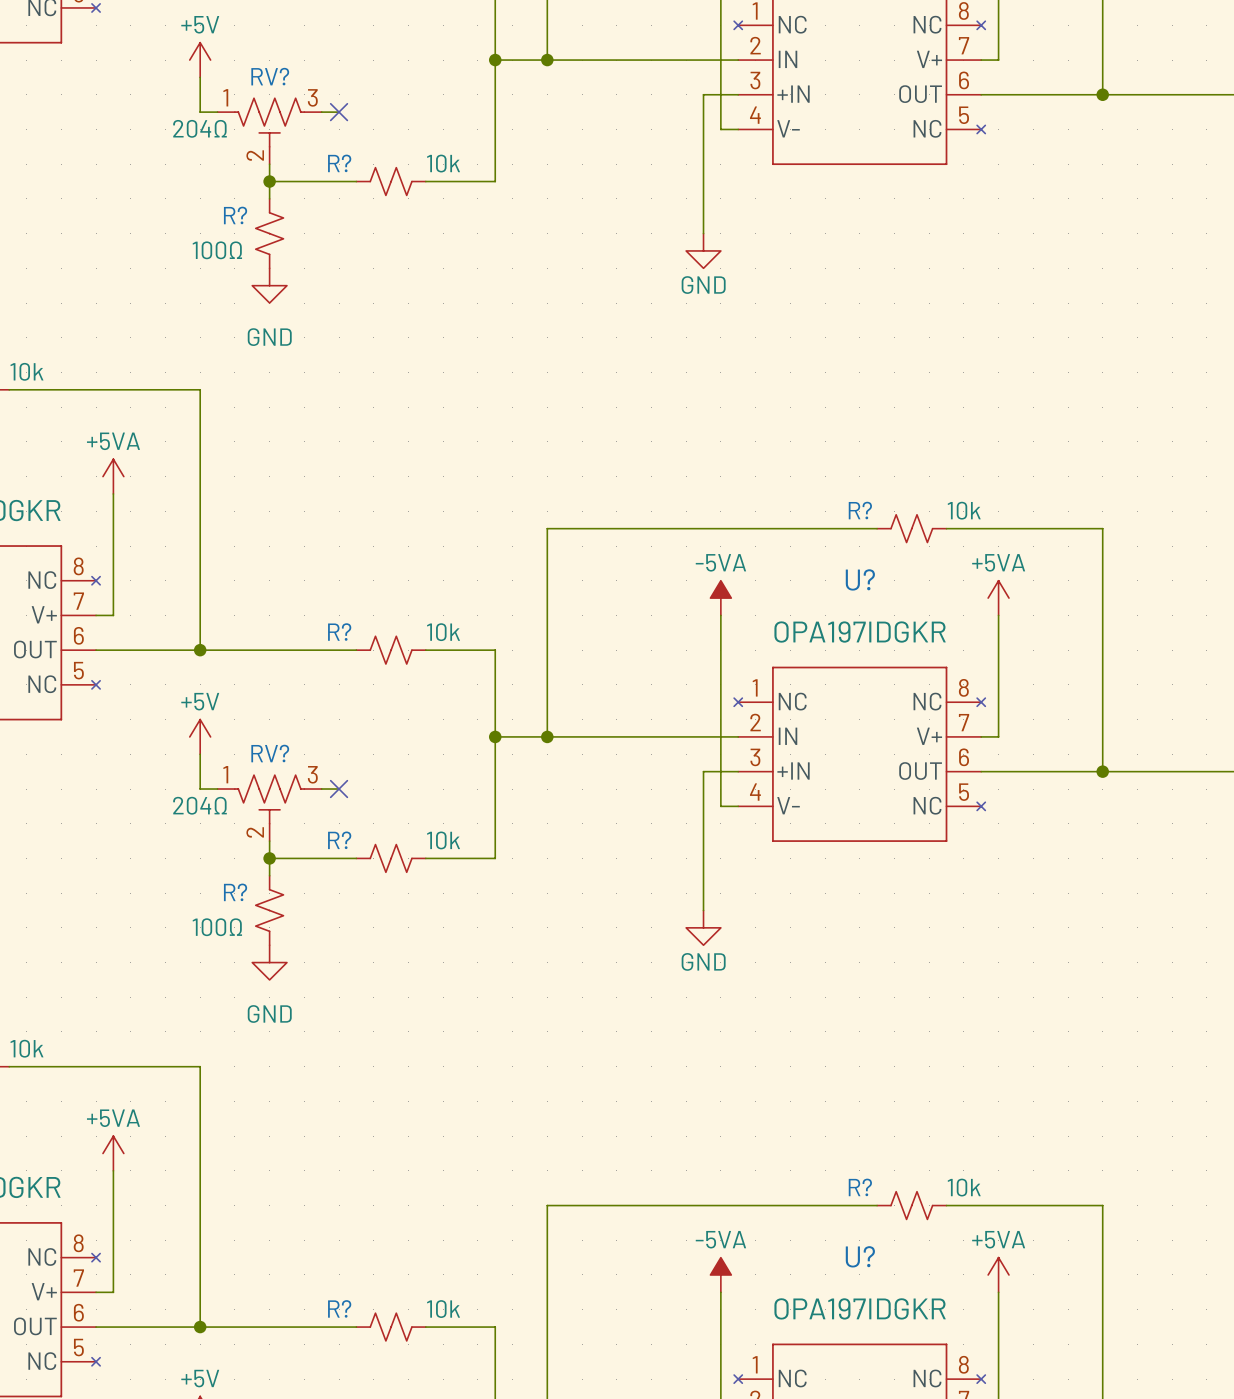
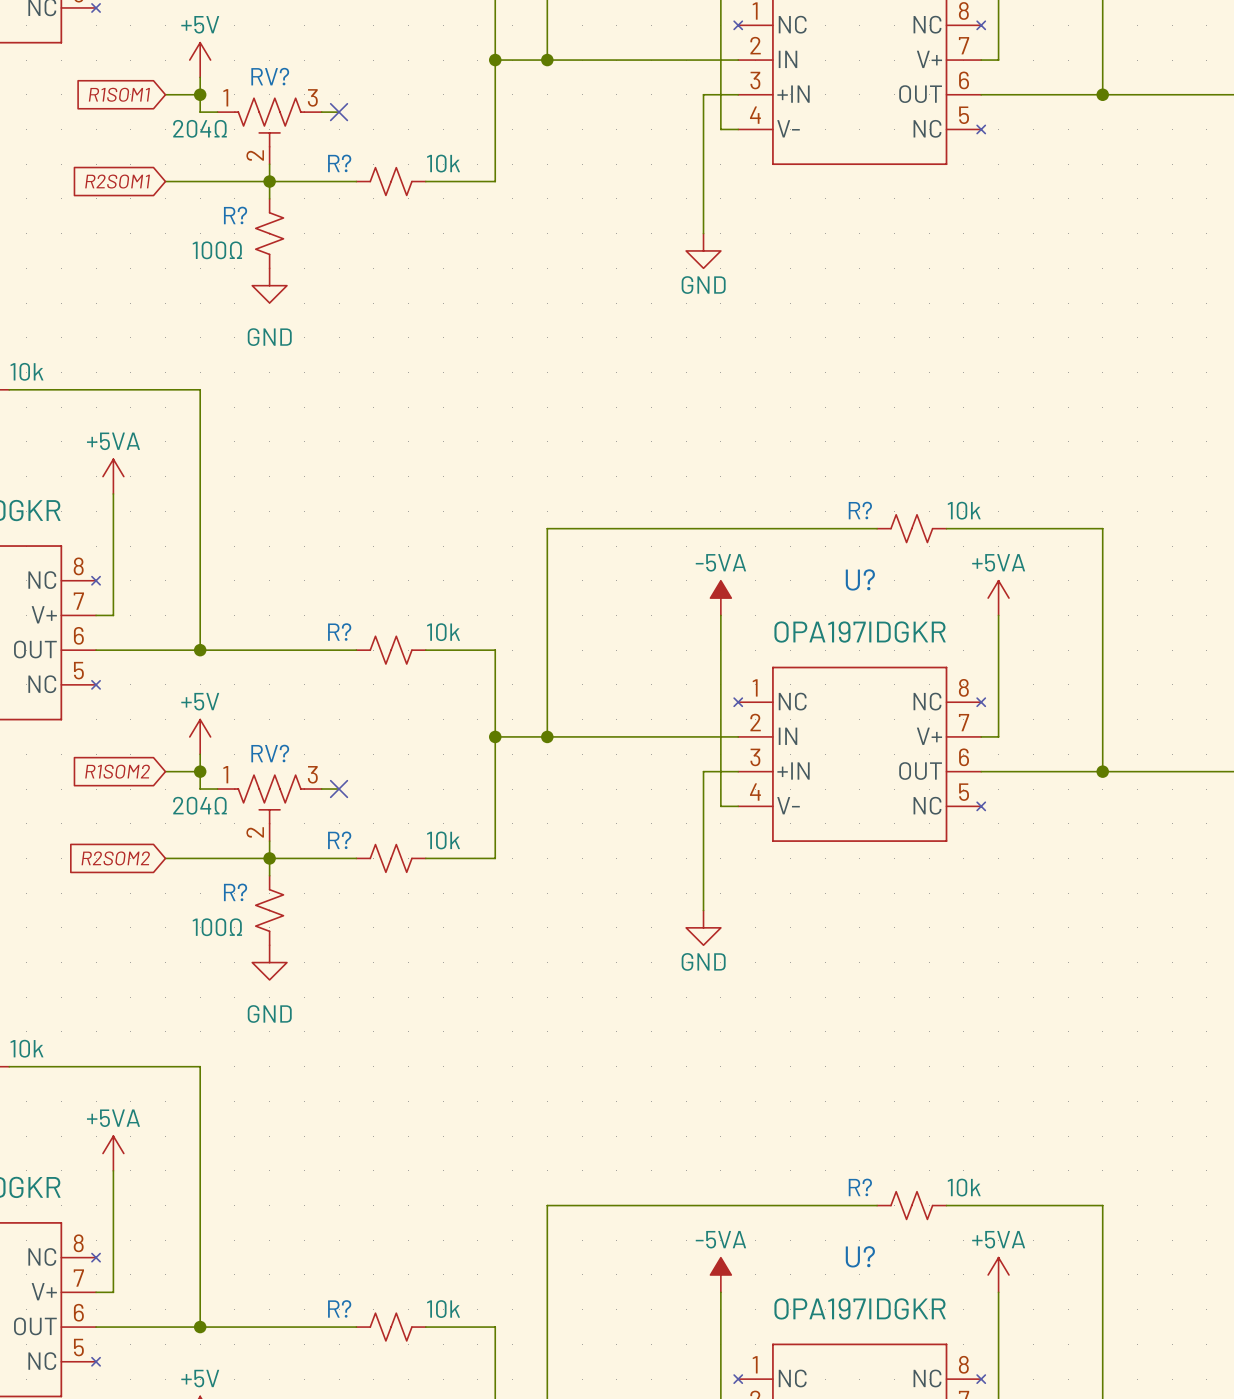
global label: none -> R1SOM1 (119, 94)
wire: none -> (165, 94) (200, 94)
junction: none -> (200, 94)
global label: none -> R2SOM1 (117, 181)
wire: none -> (165, 181) (269, 181)
global label: none -> R1SOM2 (117, 771)
wire: none -> (165, 771) (200, 771)
junction: none -> (200, 771)
global label: none -> R2SOM2 (115, 858)
wire: none -> (165, 858) (269, 858)

